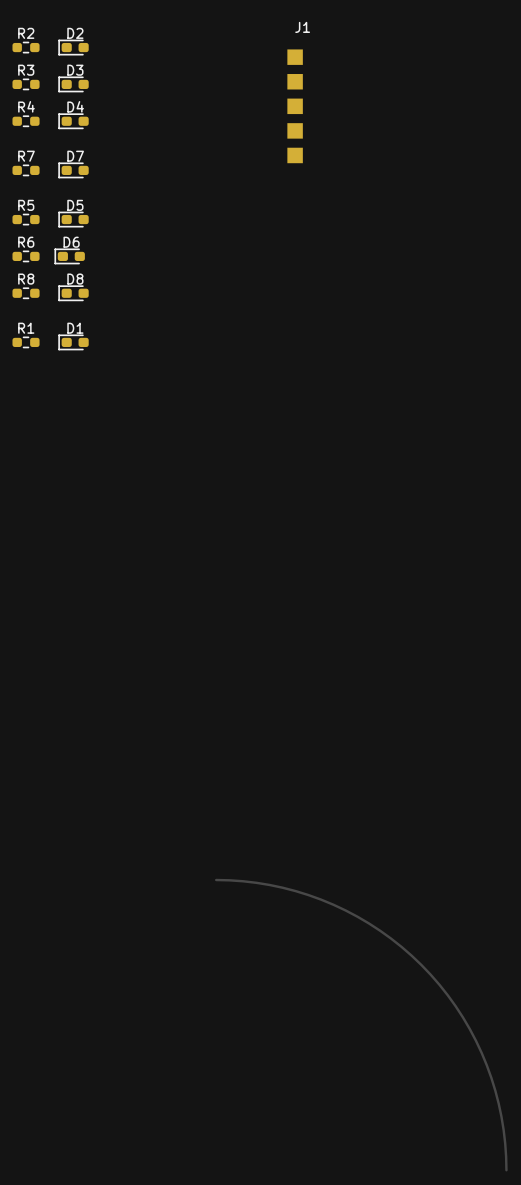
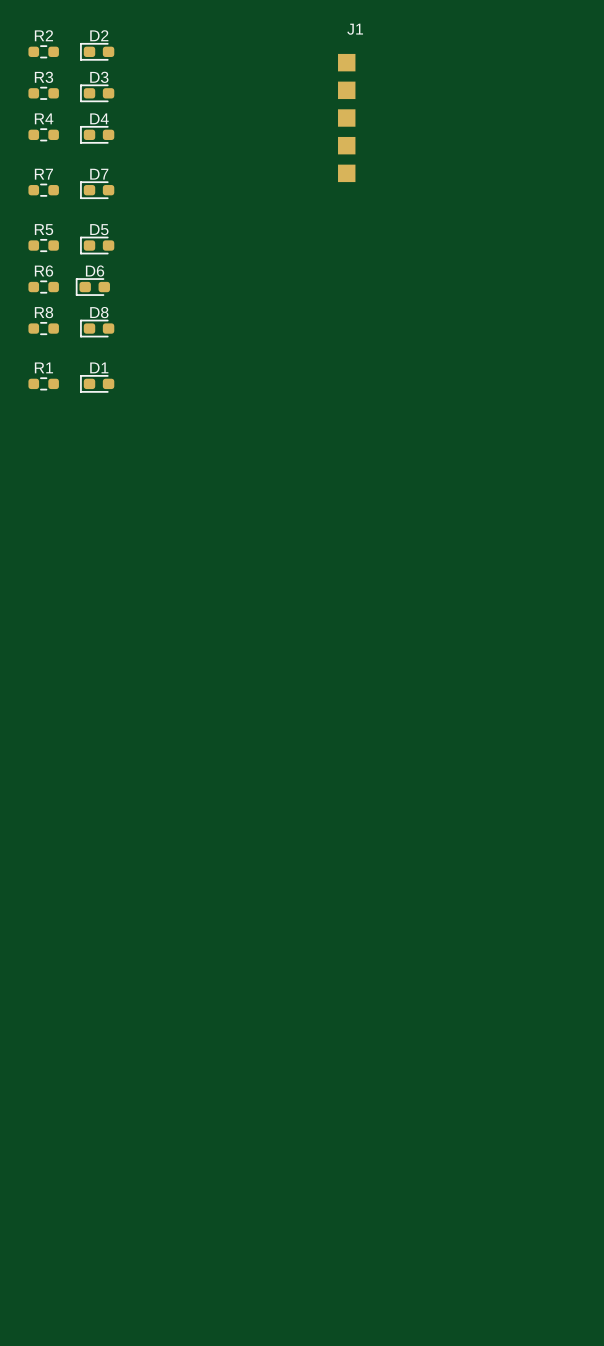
track: (216, 880) (256, 882) (282, 887) (333, 904) (380, 930) (421, 965) (455, 1006) (469, 1029) (486, 1065) (501, 1116) (506, 1170) -> none

